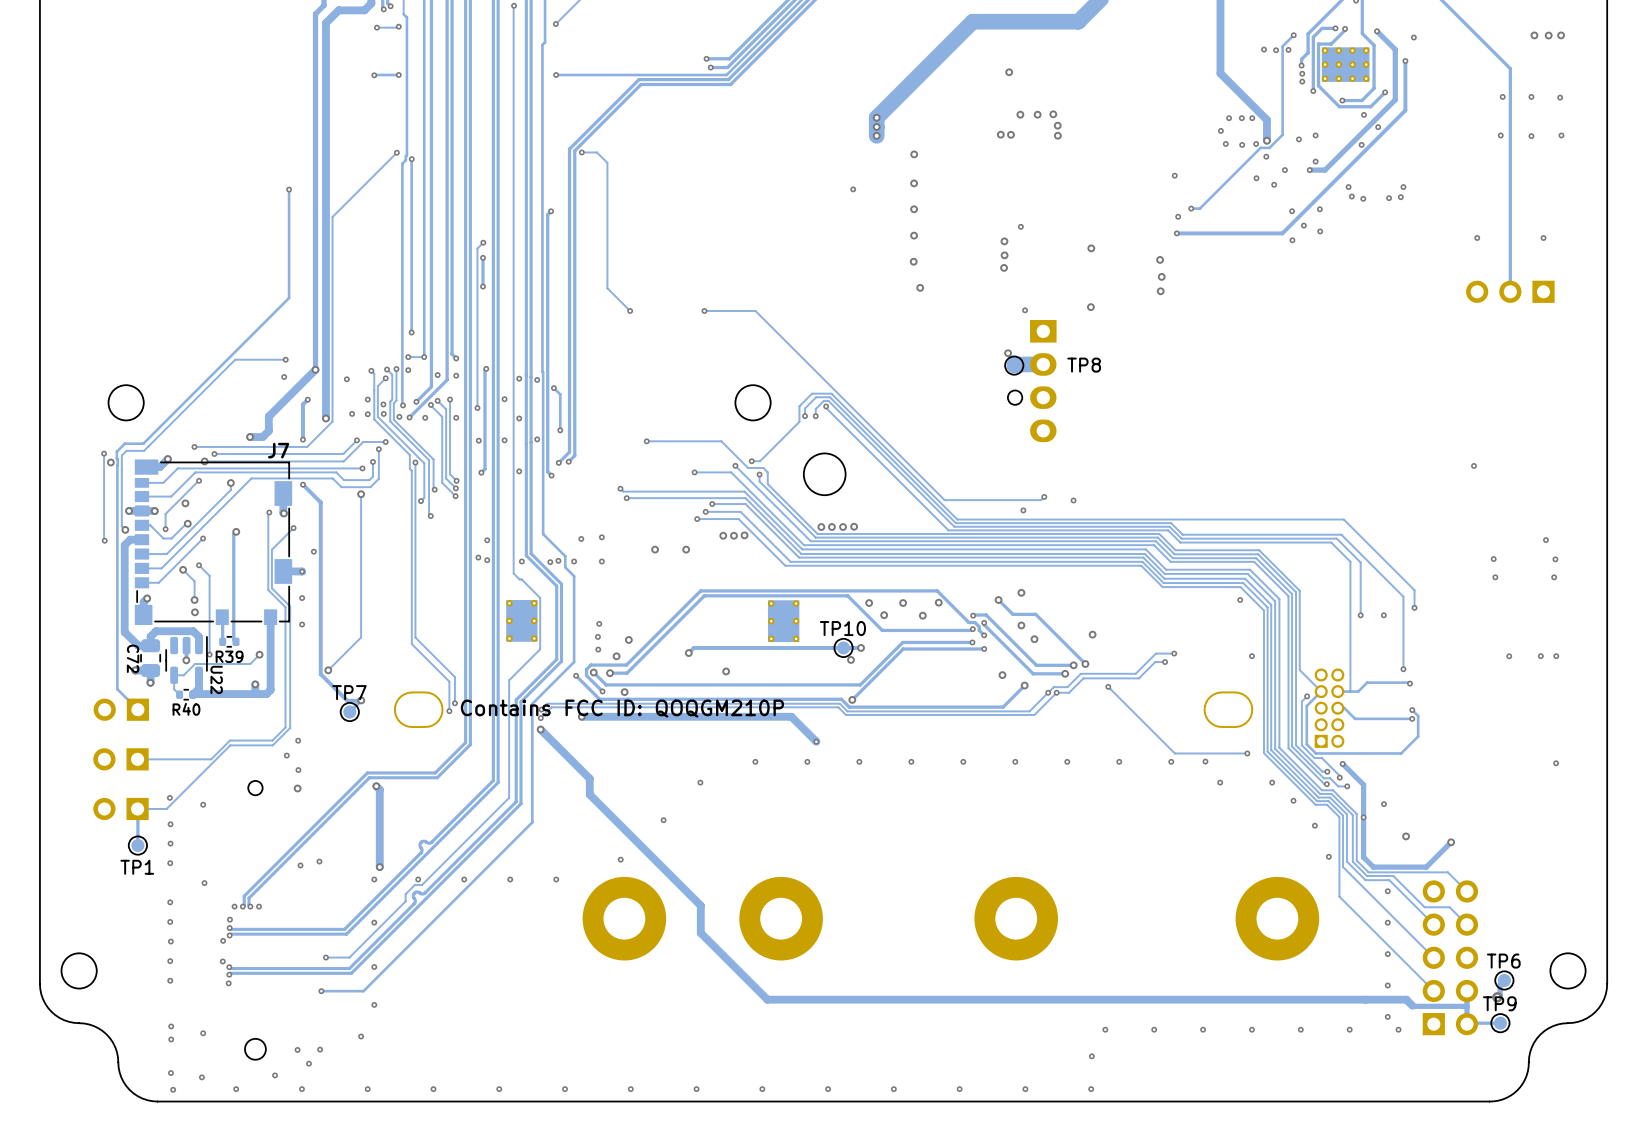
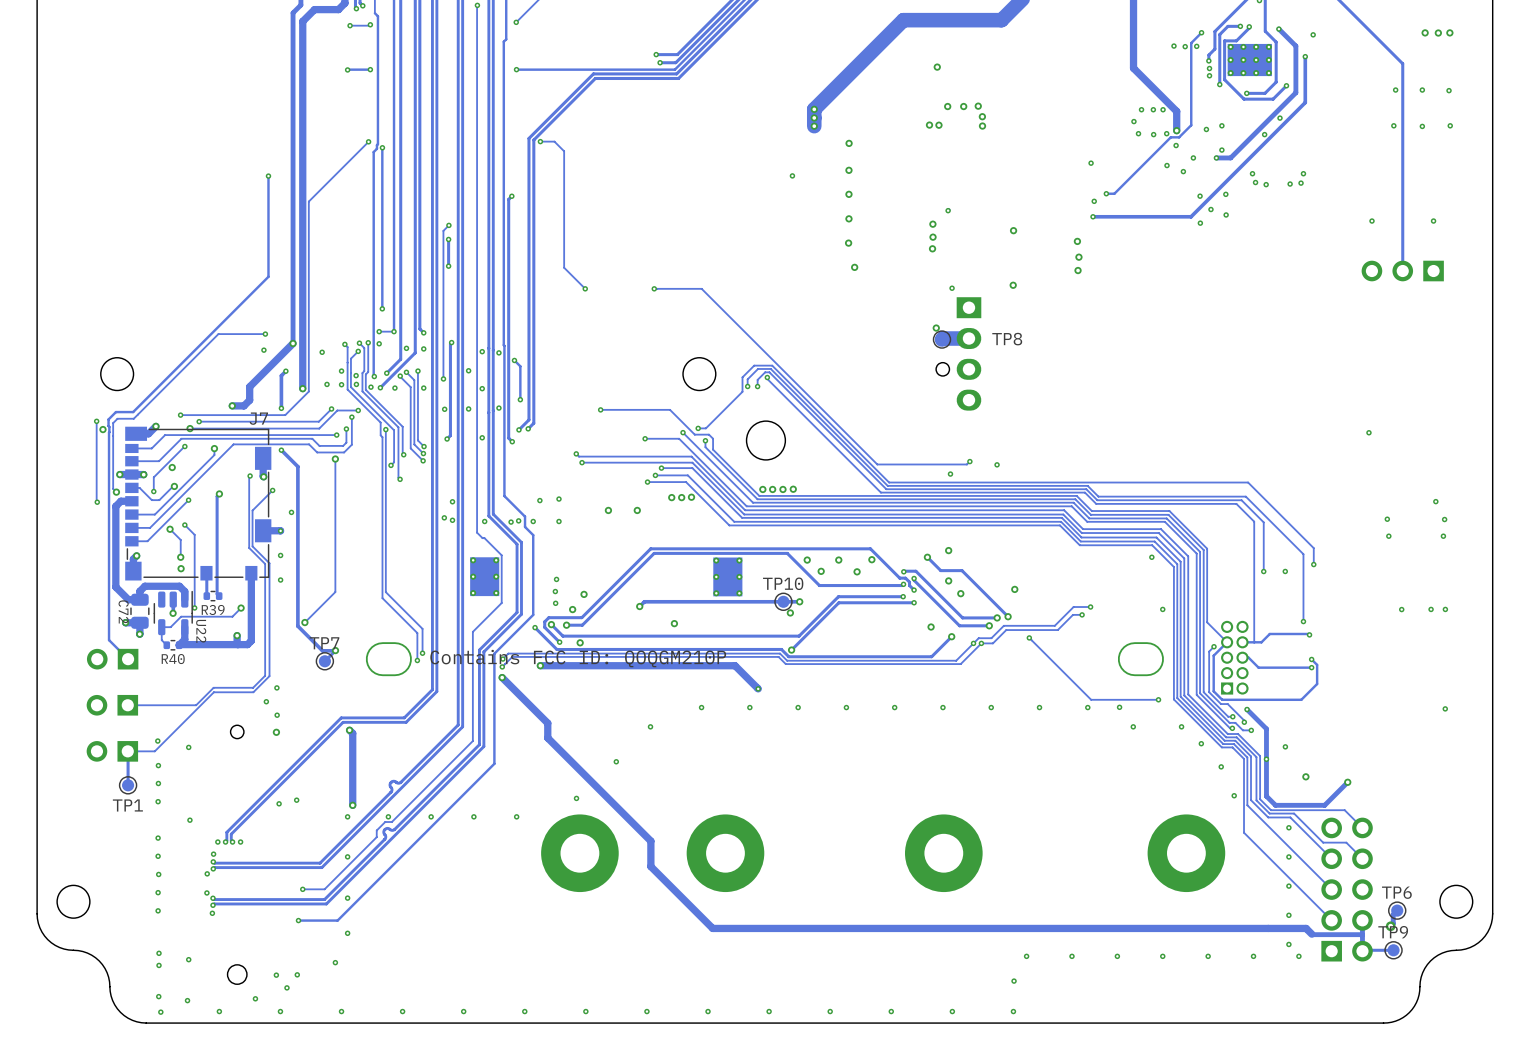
via: (1363, 114) -> none

